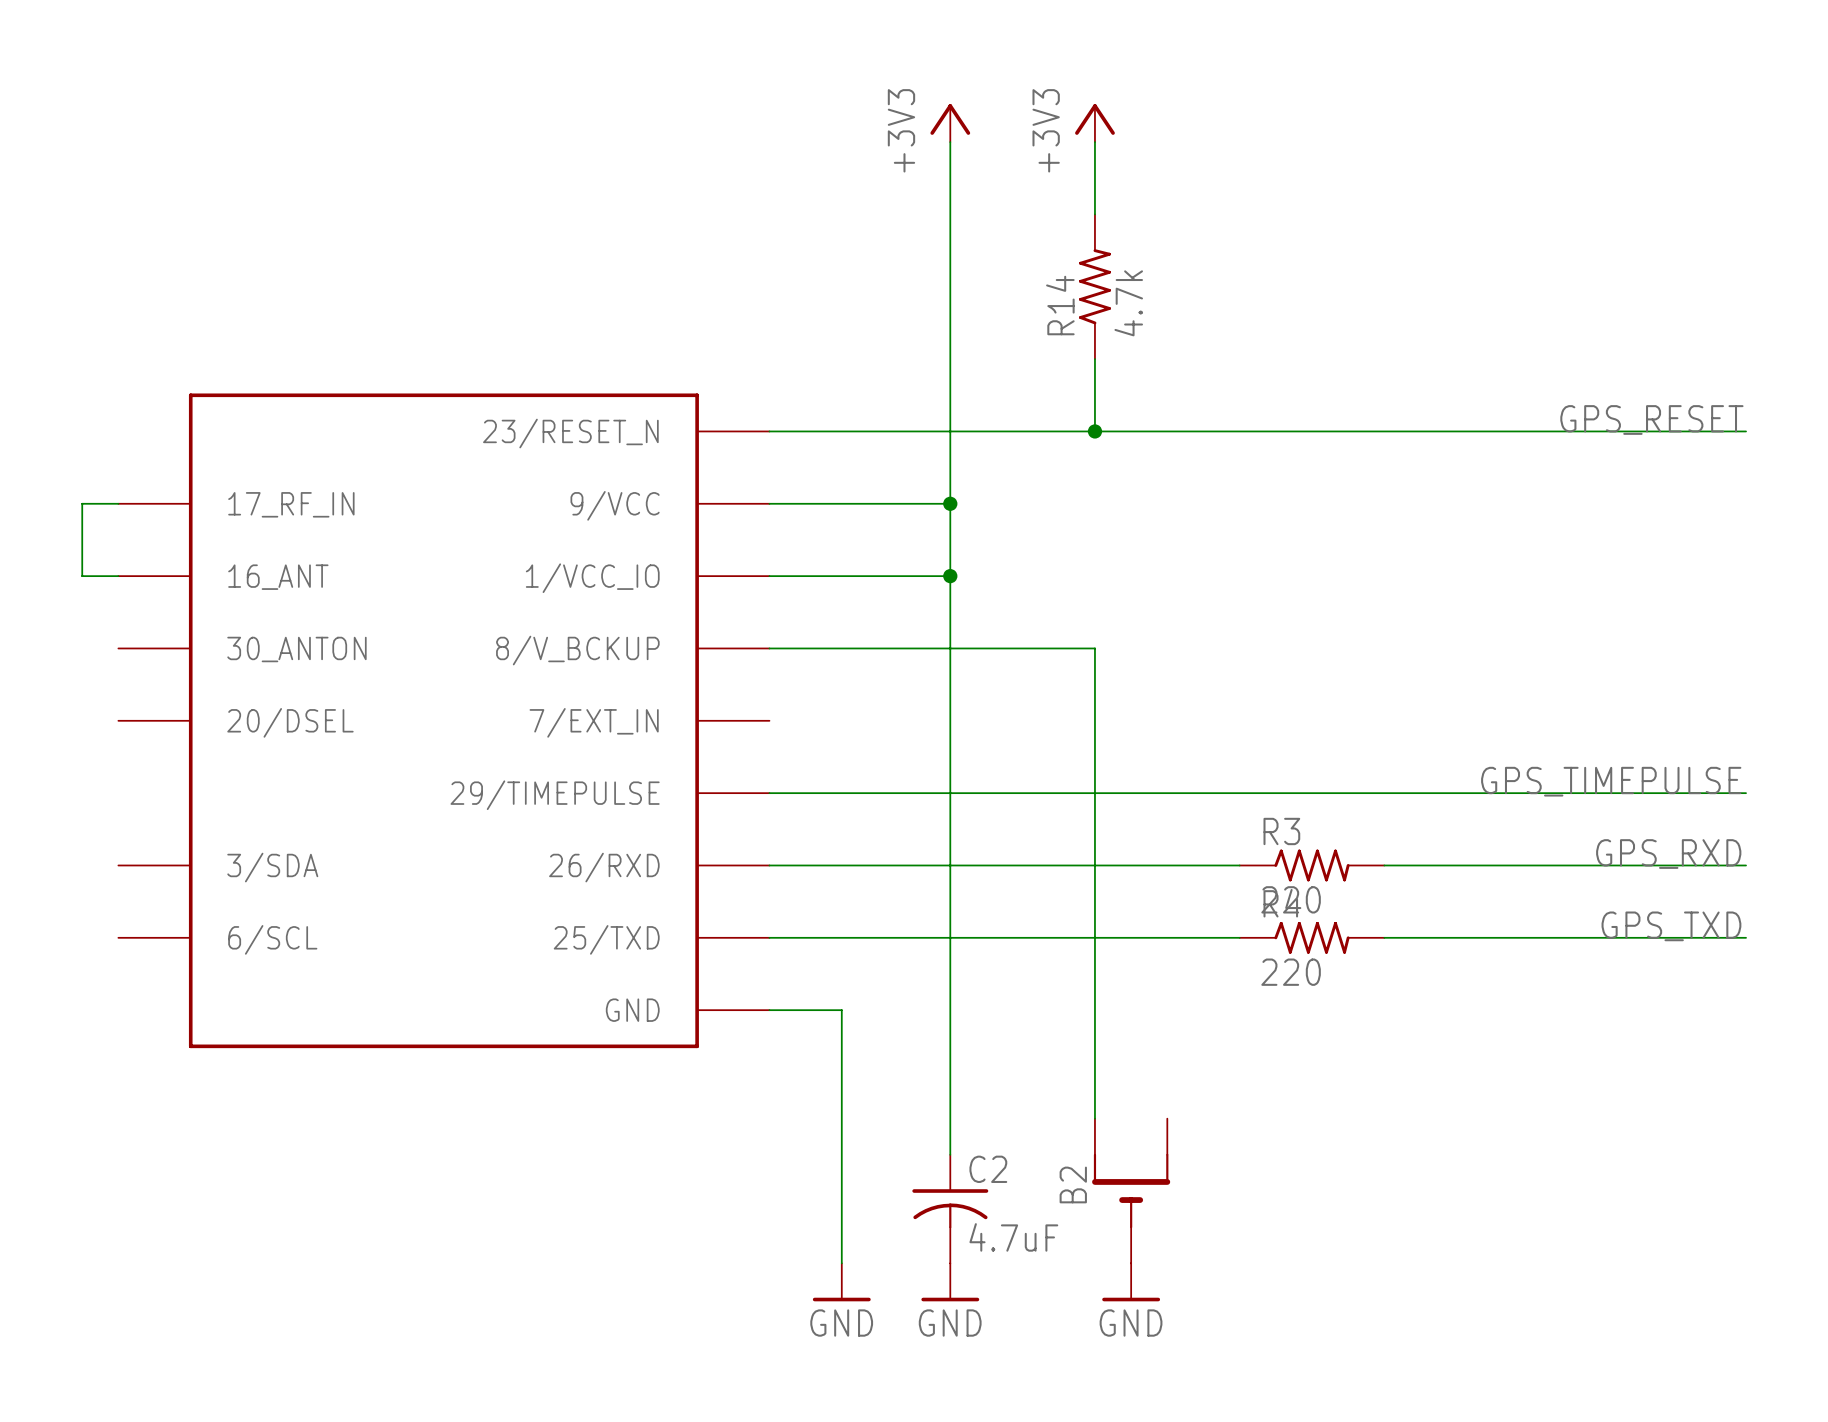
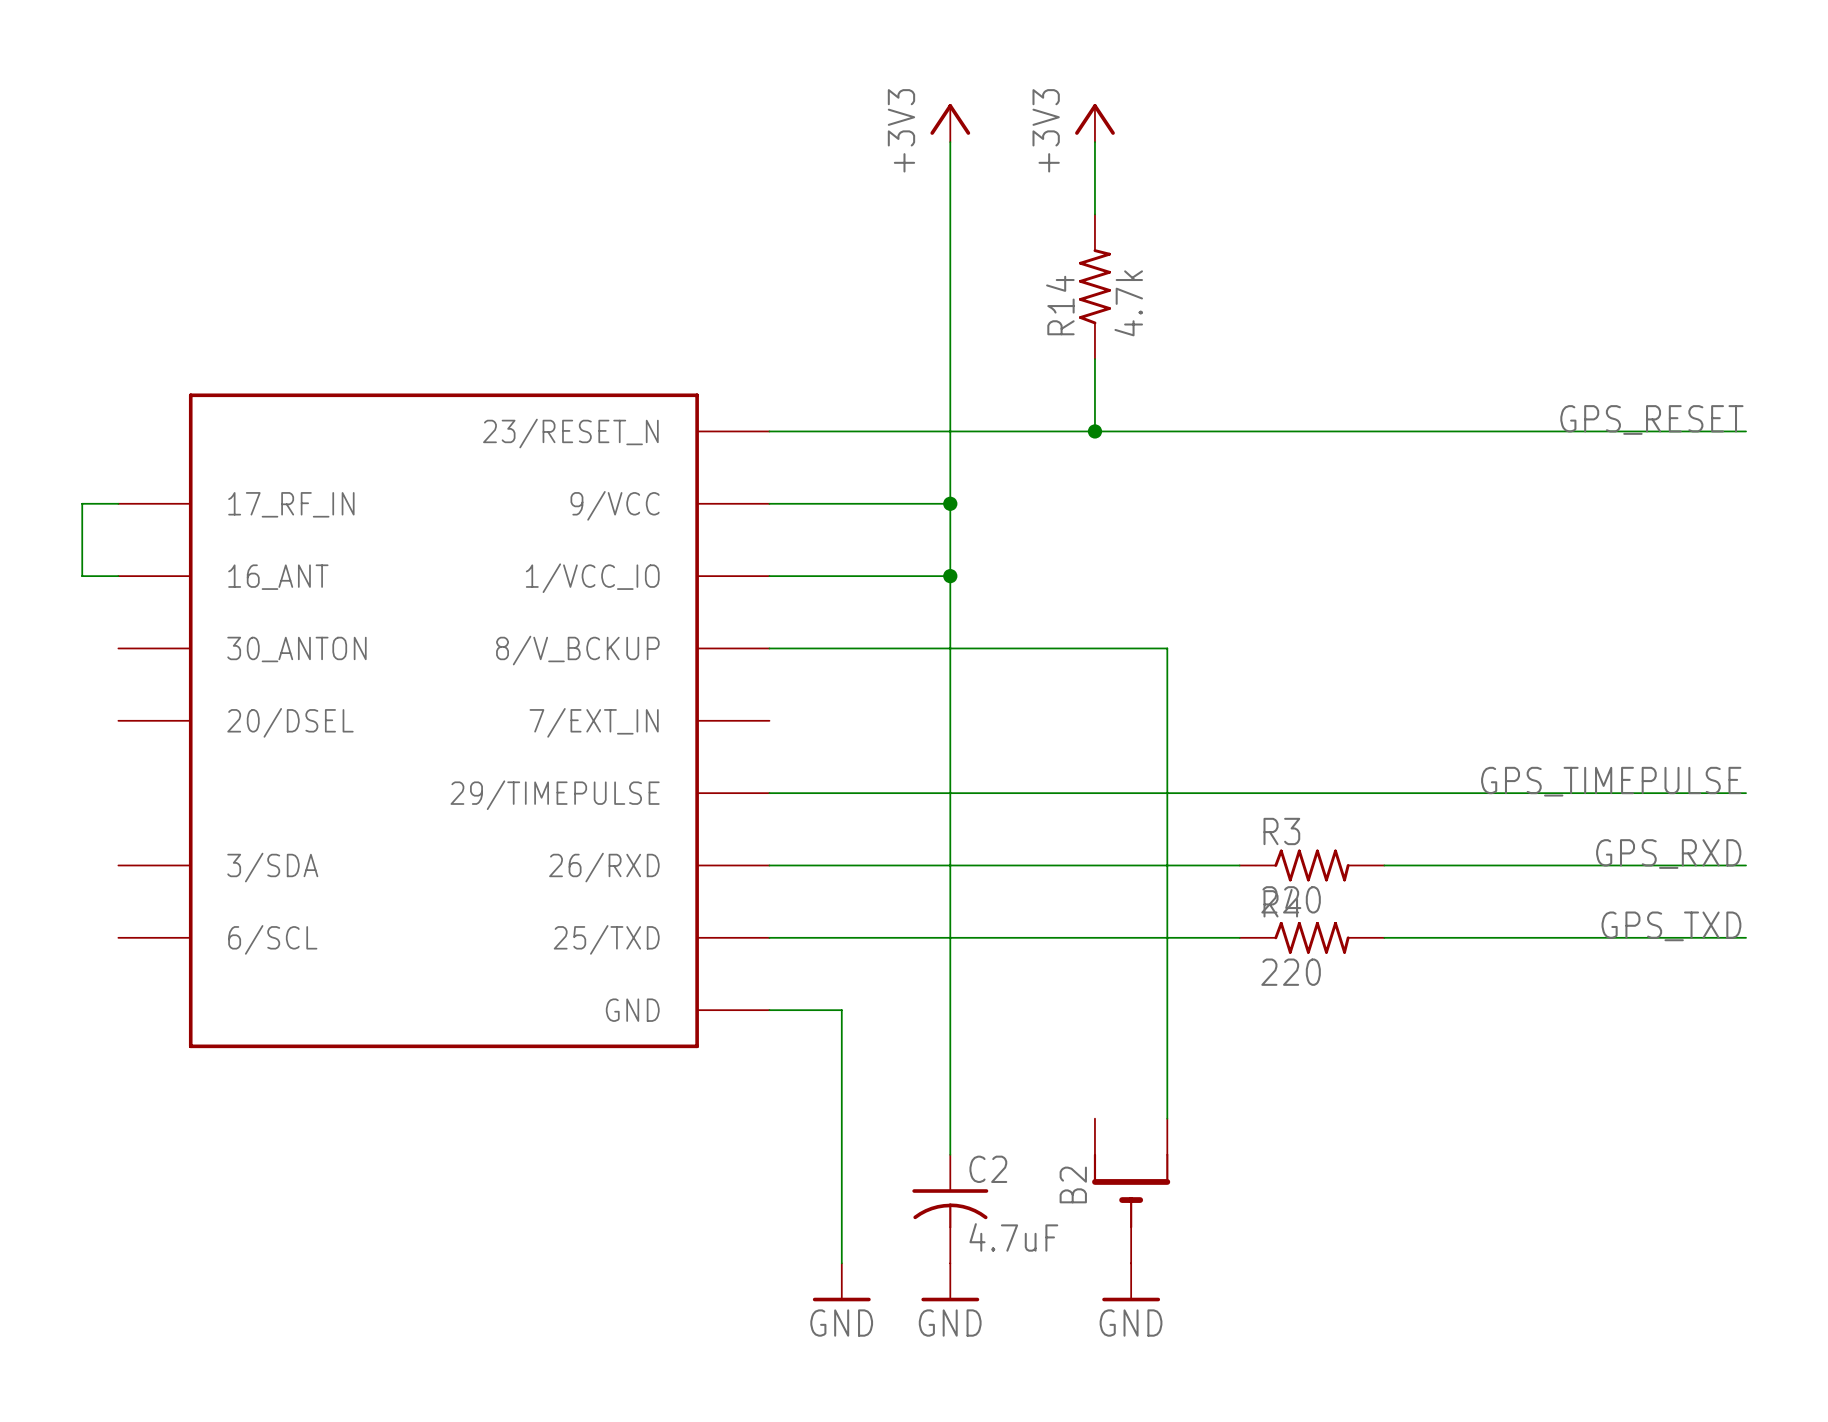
wire: (1094, 648) (1094, 1118) -> (1094, 648) (1167, 648) (1167, 1118)

